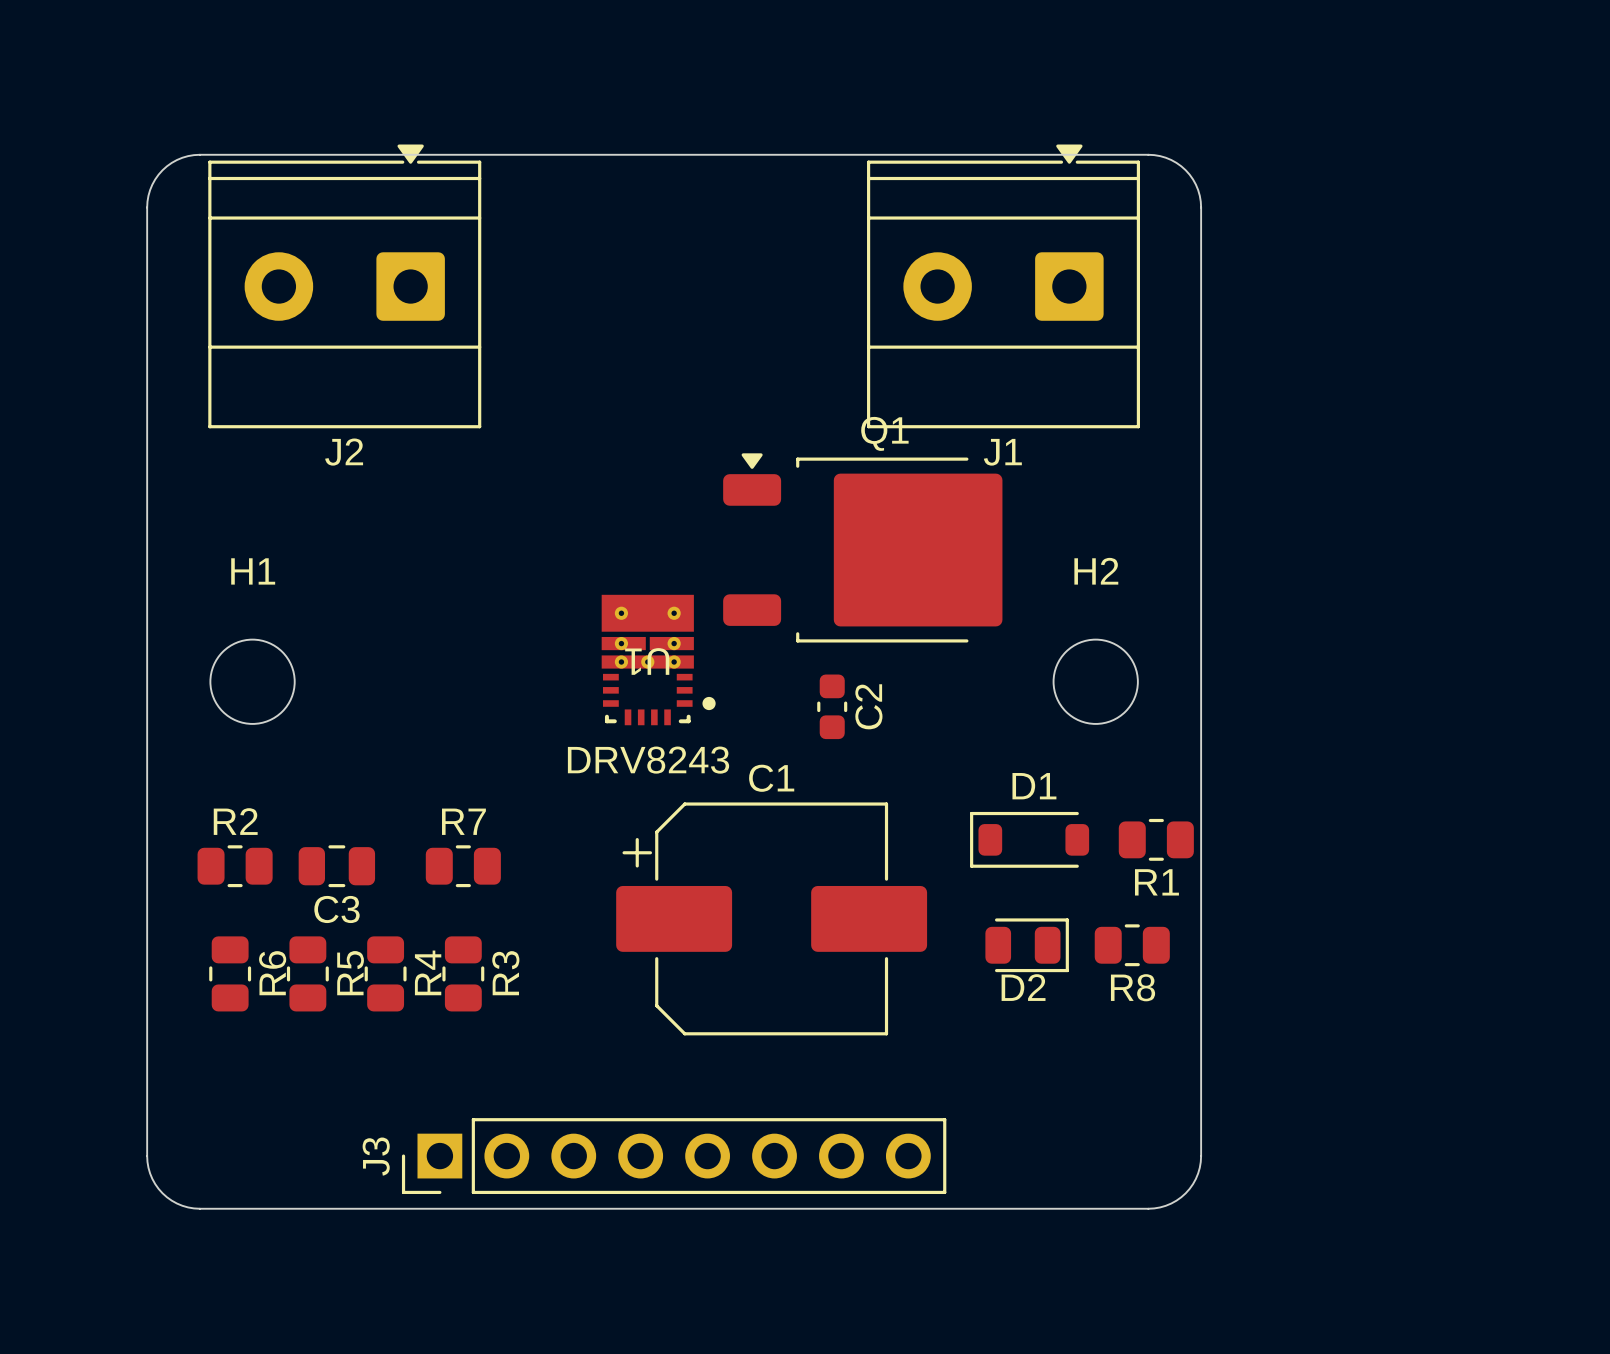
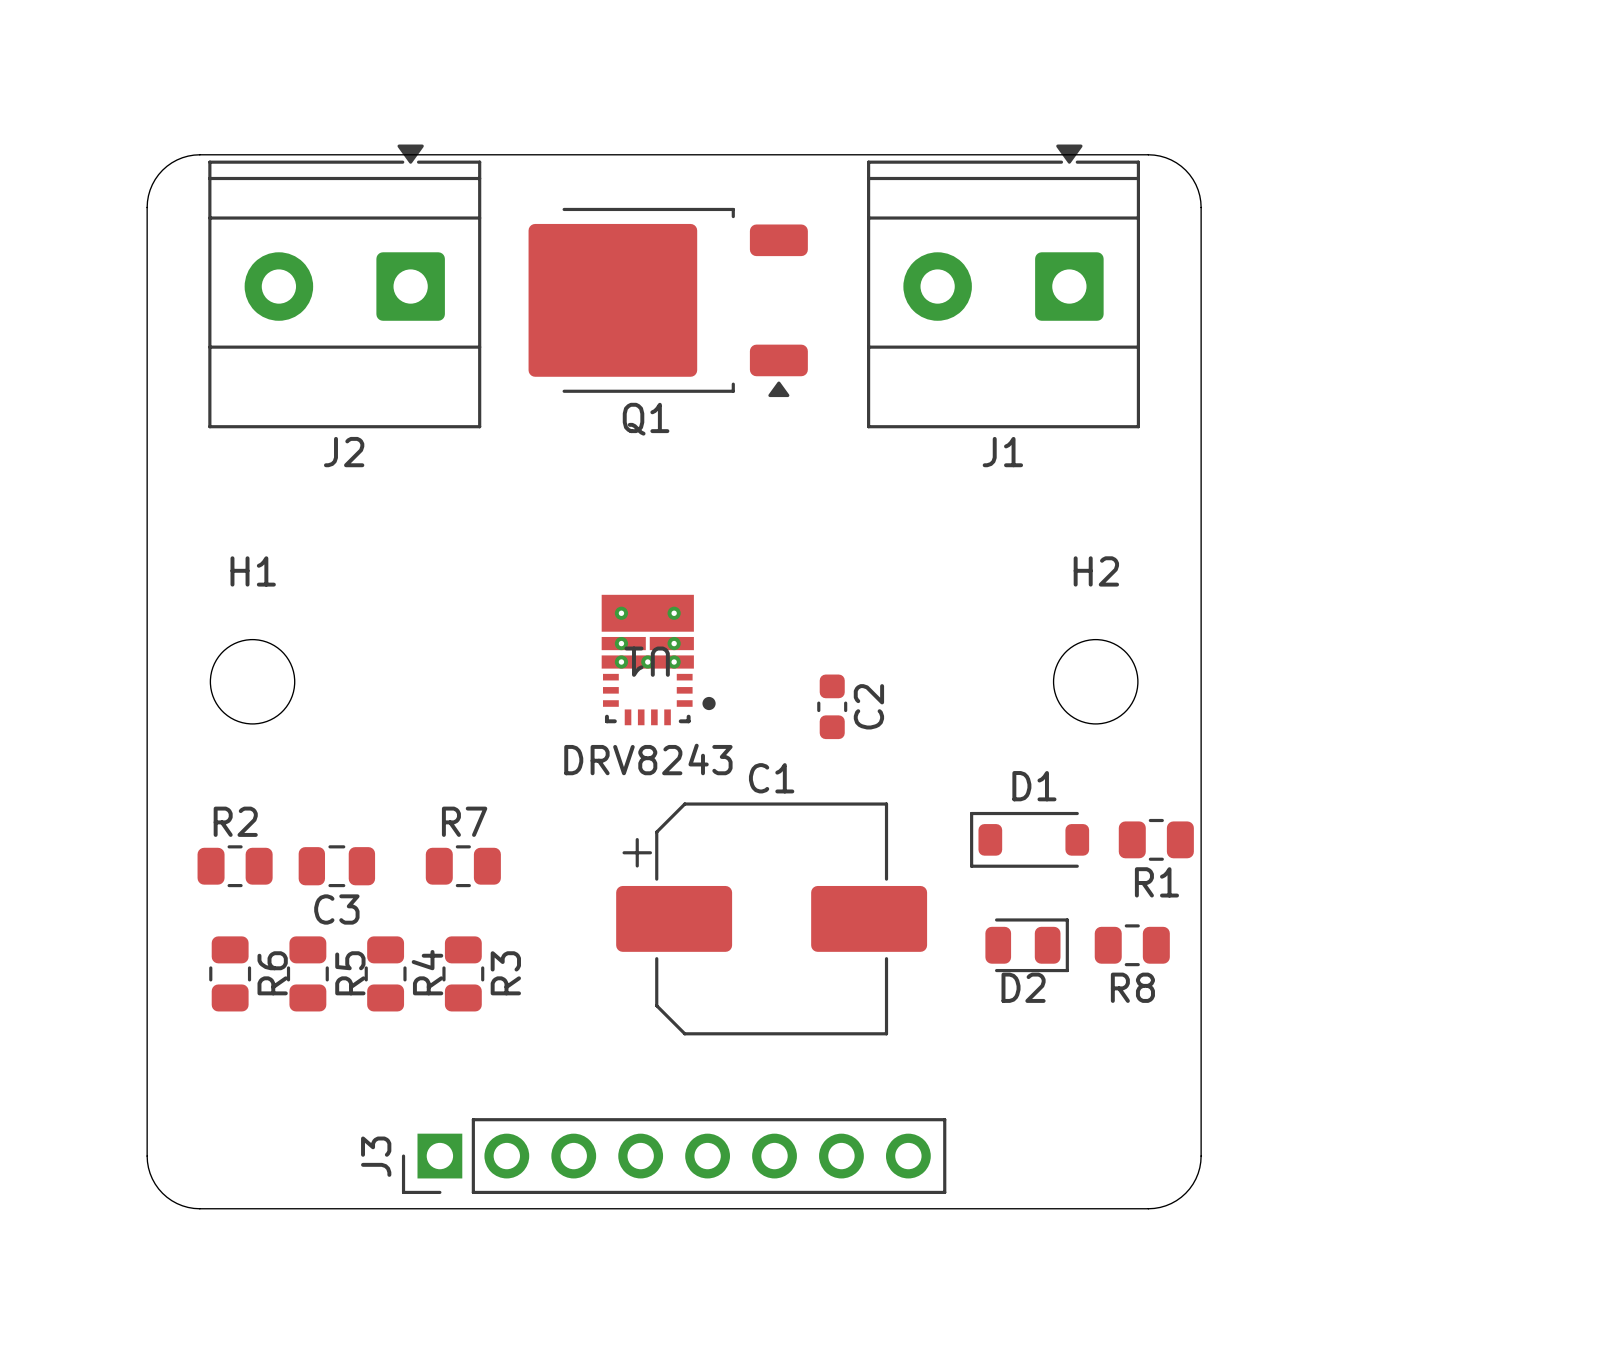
Q1 rotation: 0° (862, 547) -> 180° (668, 302)
Q1 position: (862, 547) -> (668, 302)

